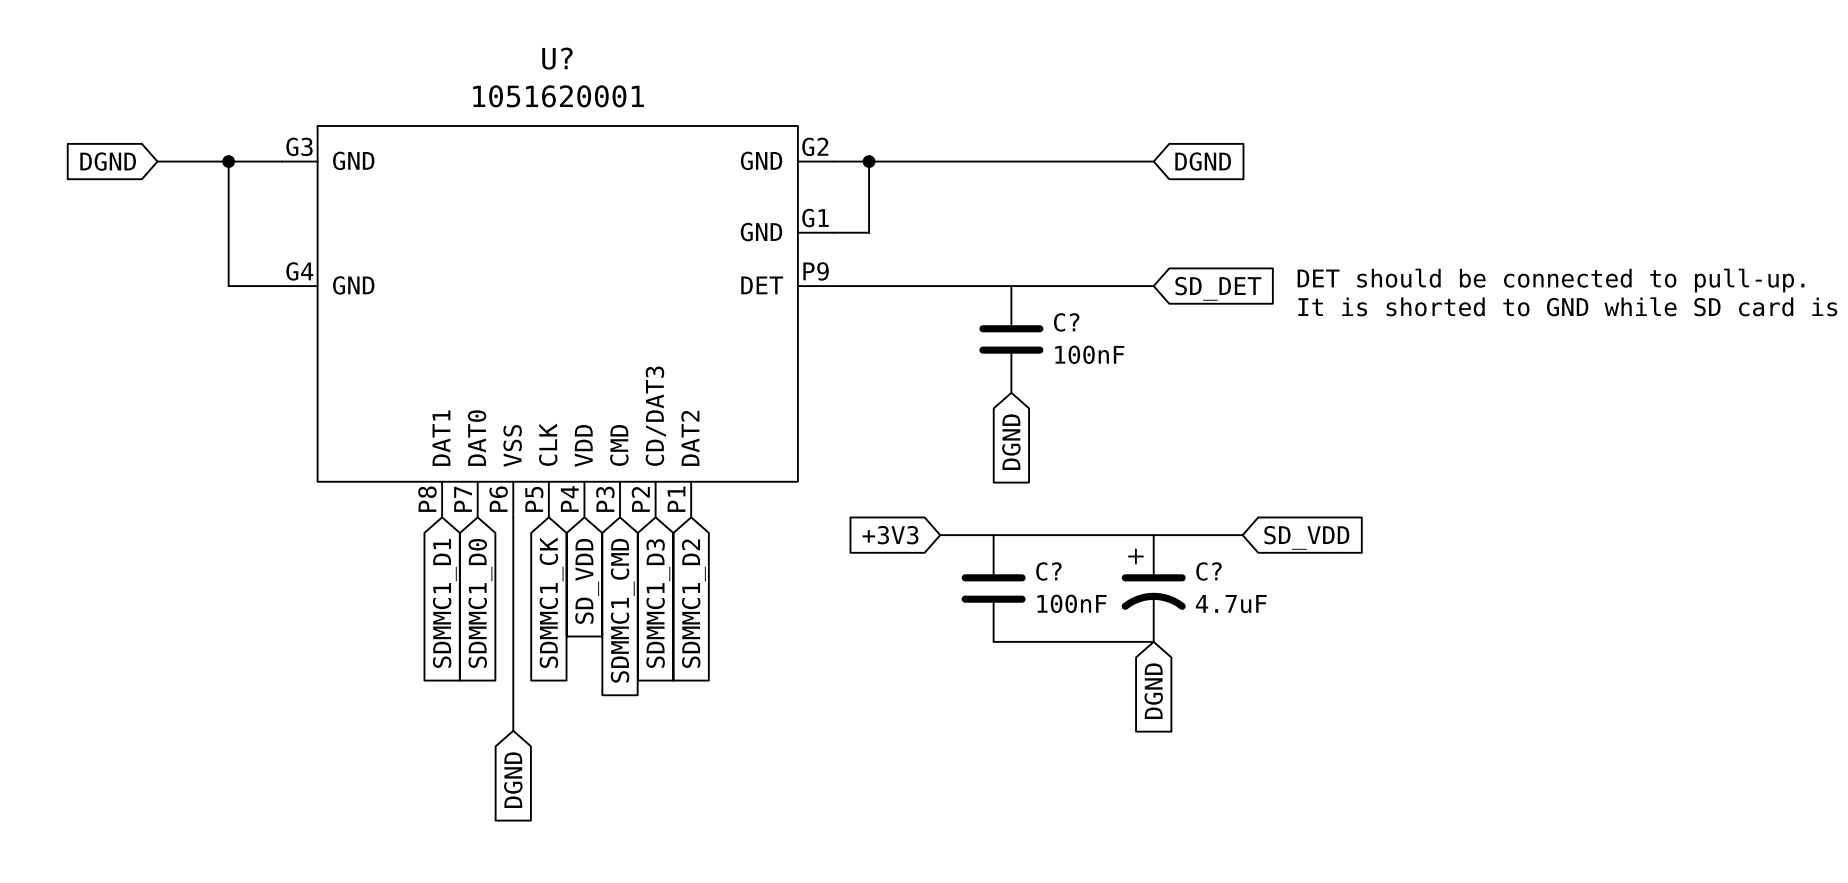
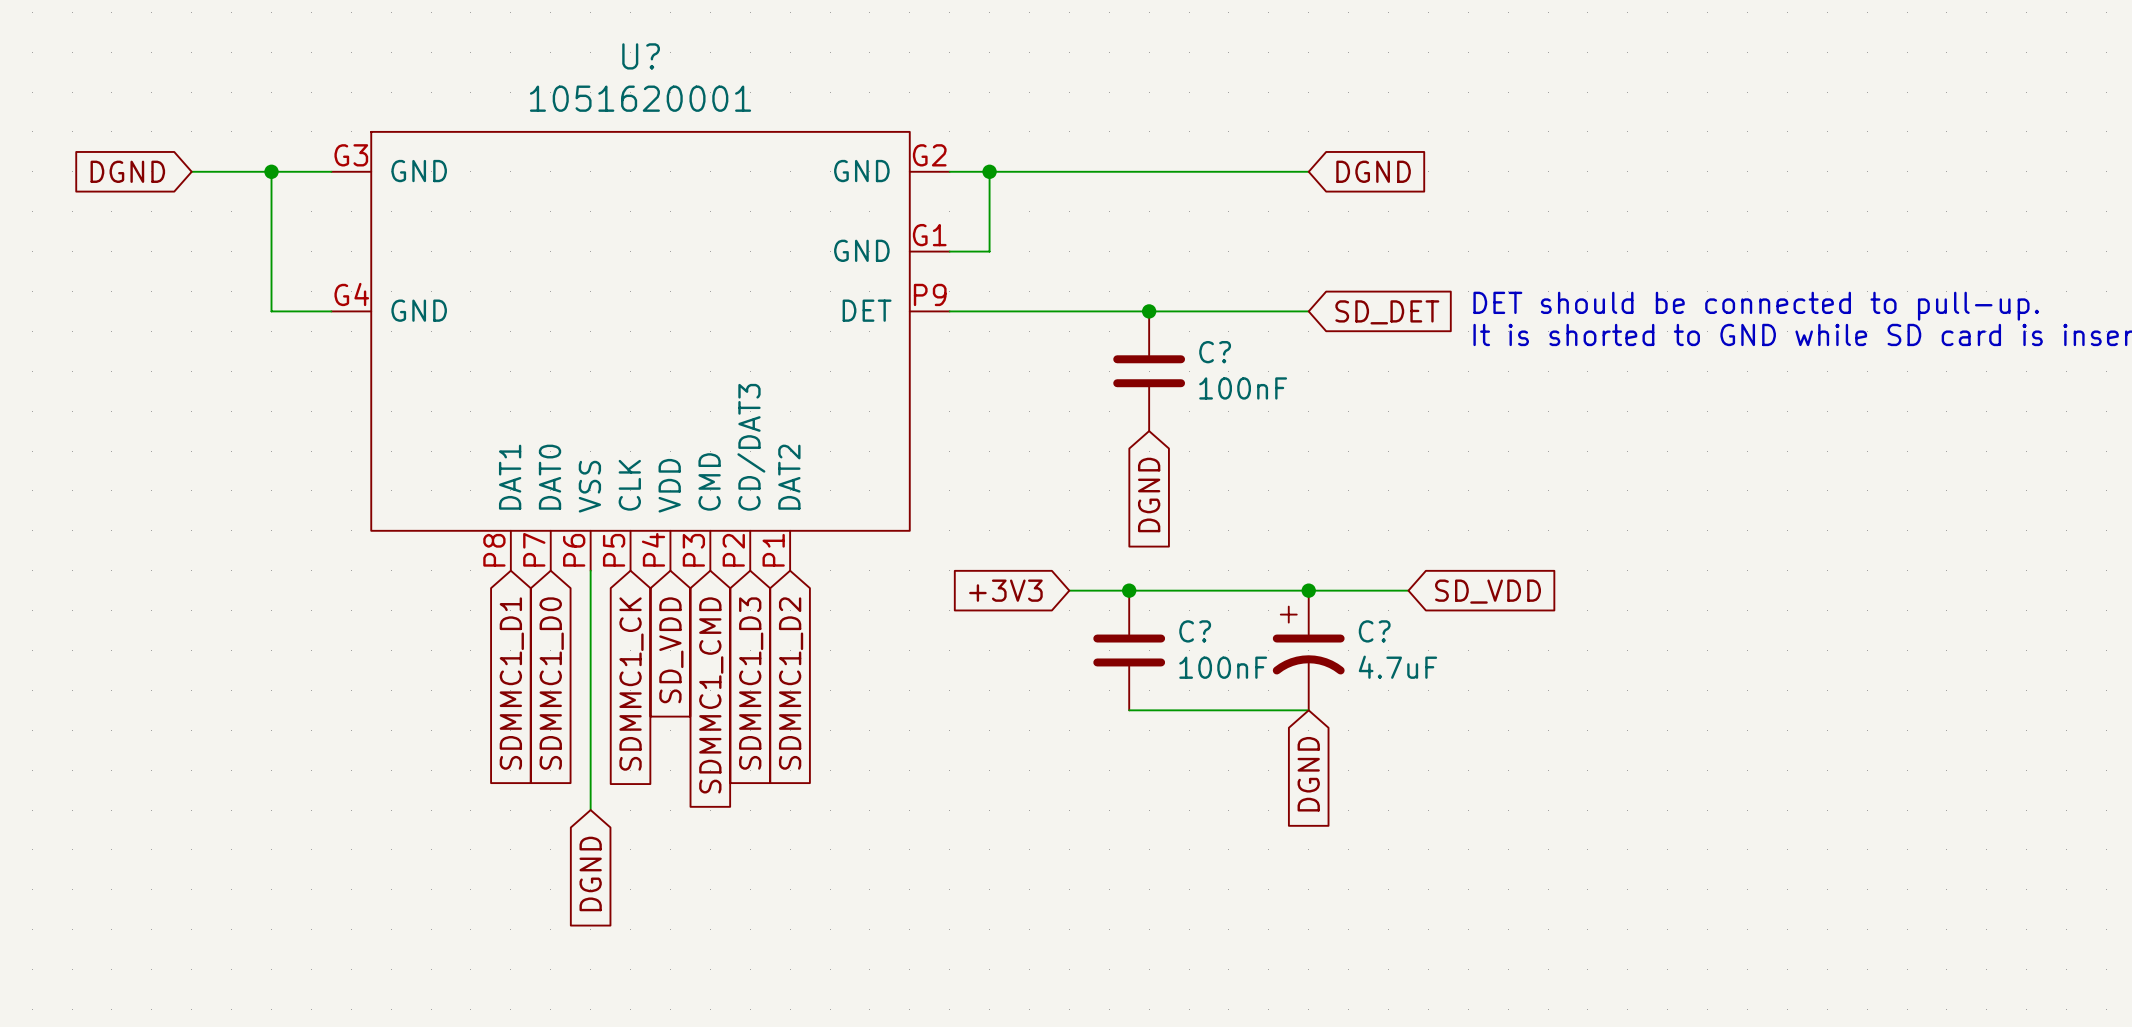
junction: none -> (1149, 311)
junction: none -> (1129, 590)
junction: none -> (1308, 590)

